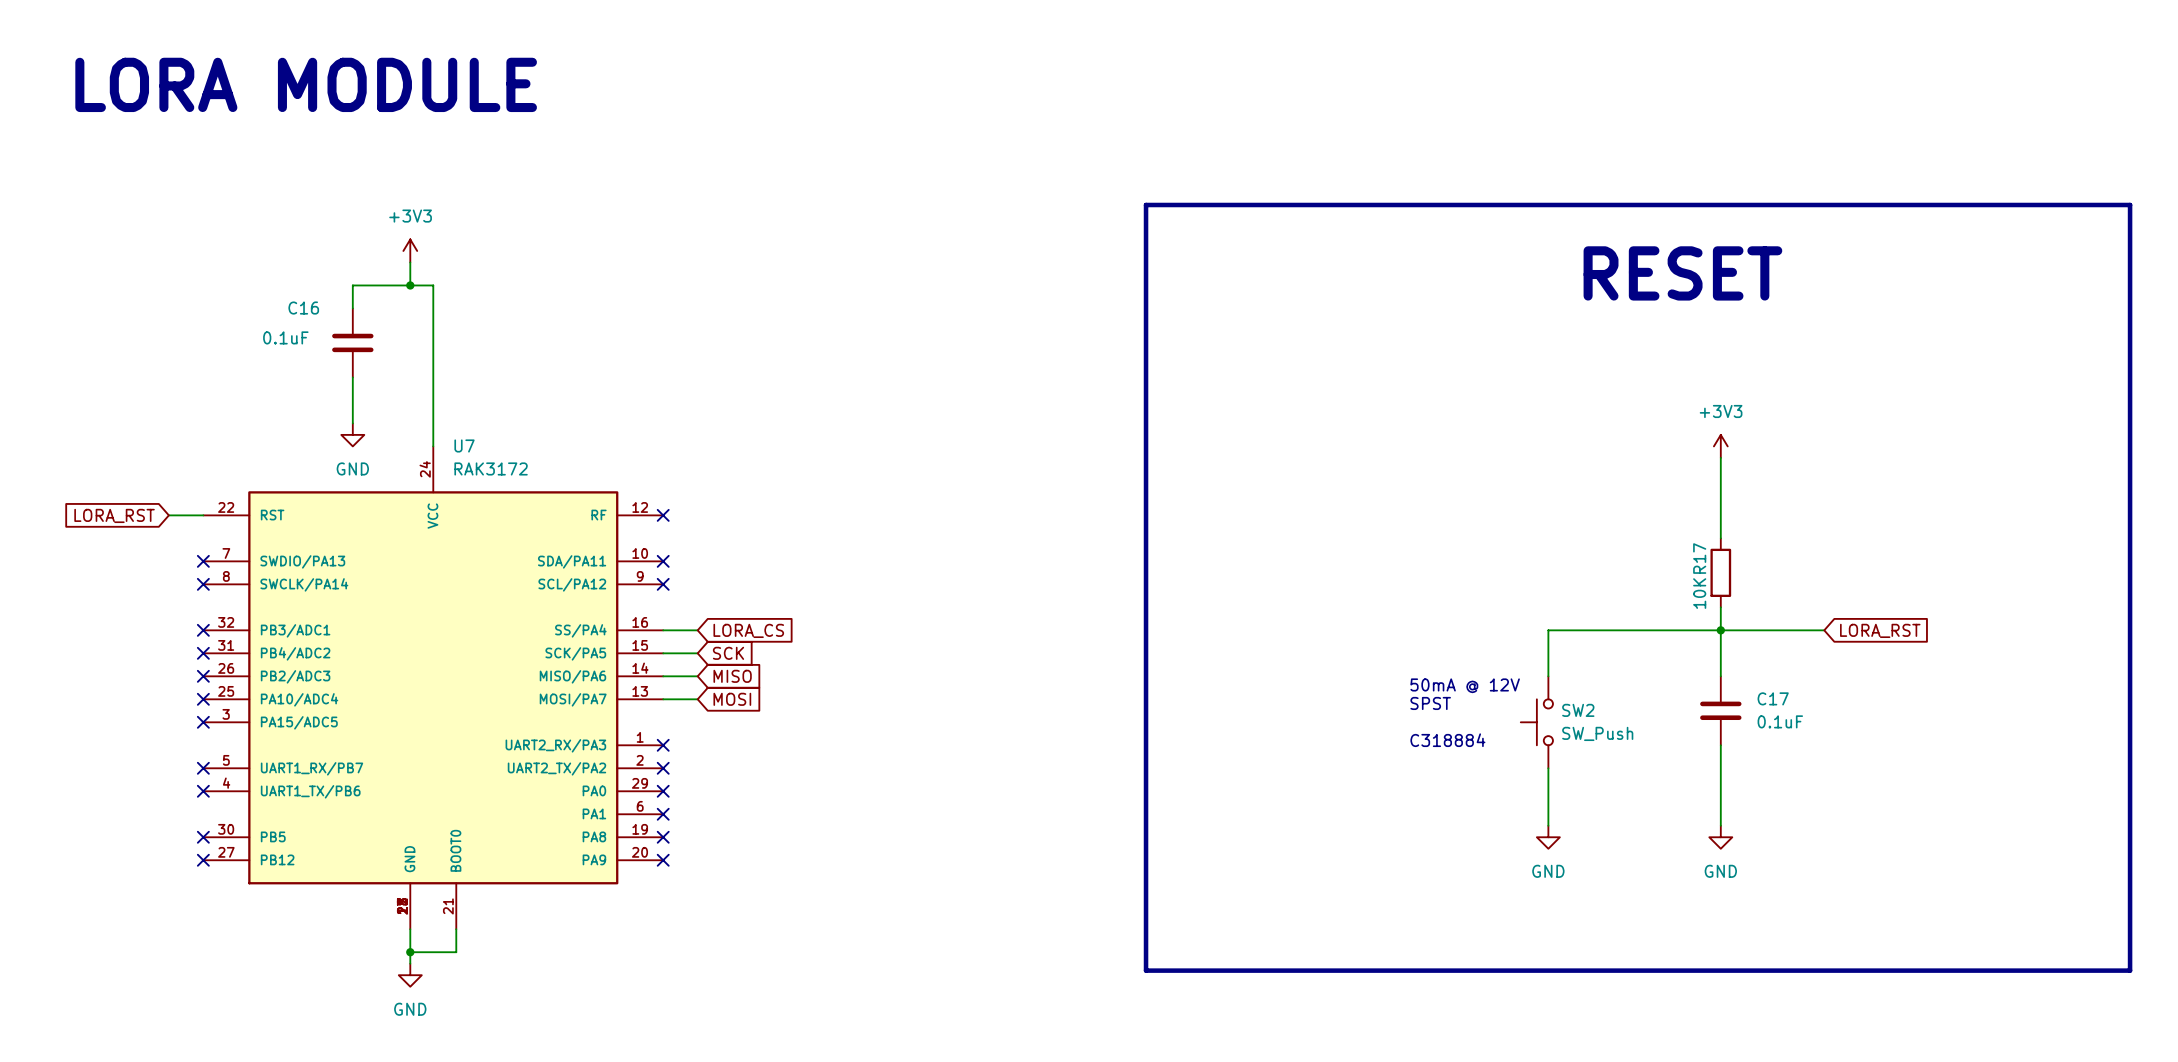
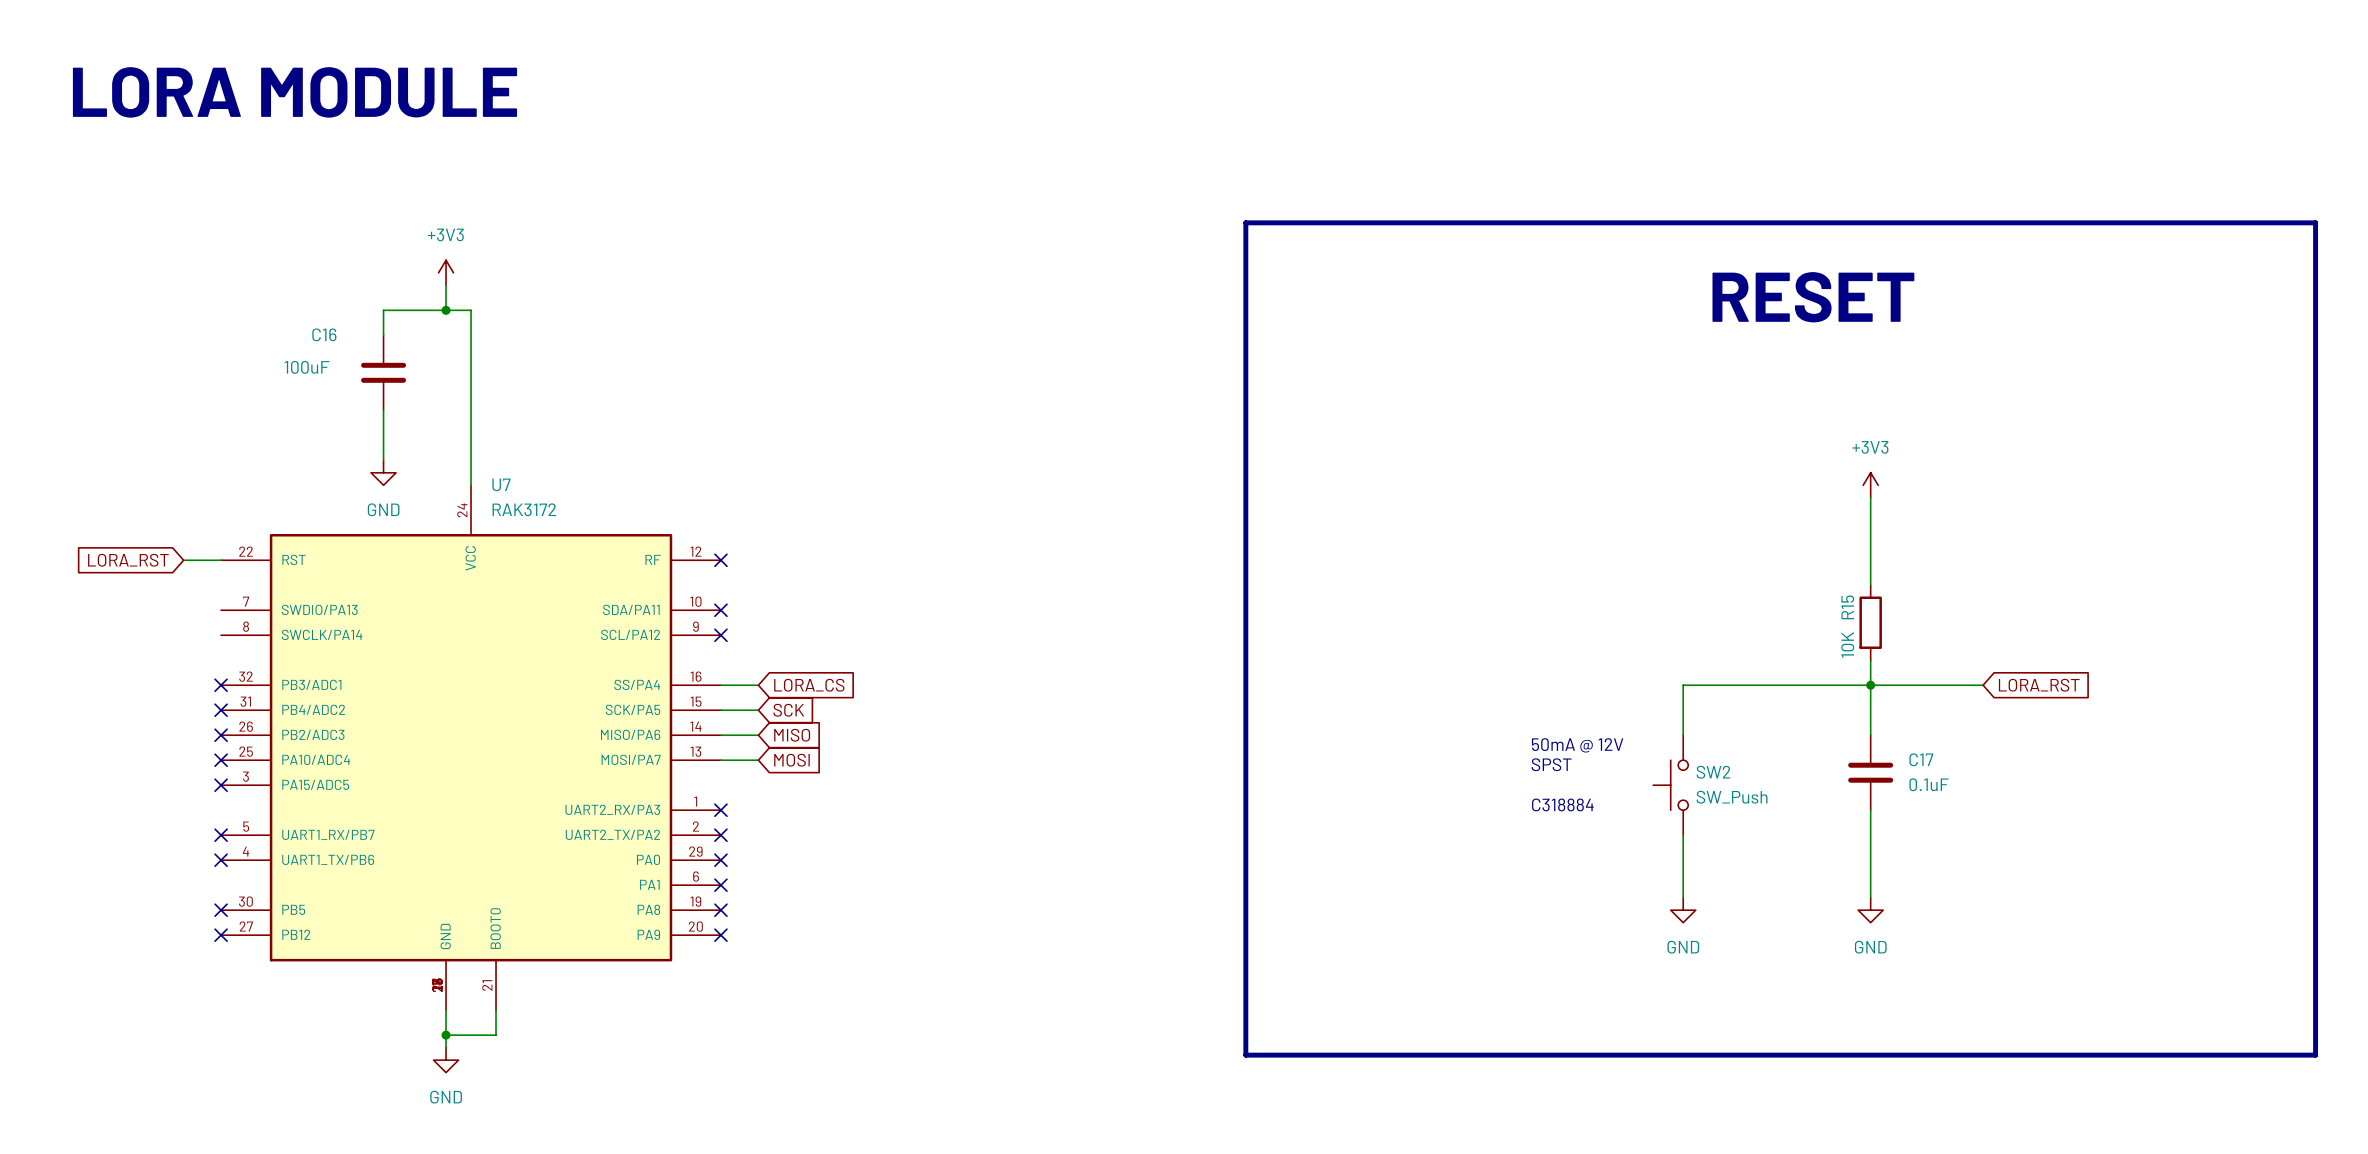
C16 value: 0.1uF (285, 337) -> 100uF (306, 367)
R17 name: R17 (1699, 558) -> R15 (1847, 607)
no-connect mark: (203, 561) -> none
no-connect mark: (203, 584) -> none

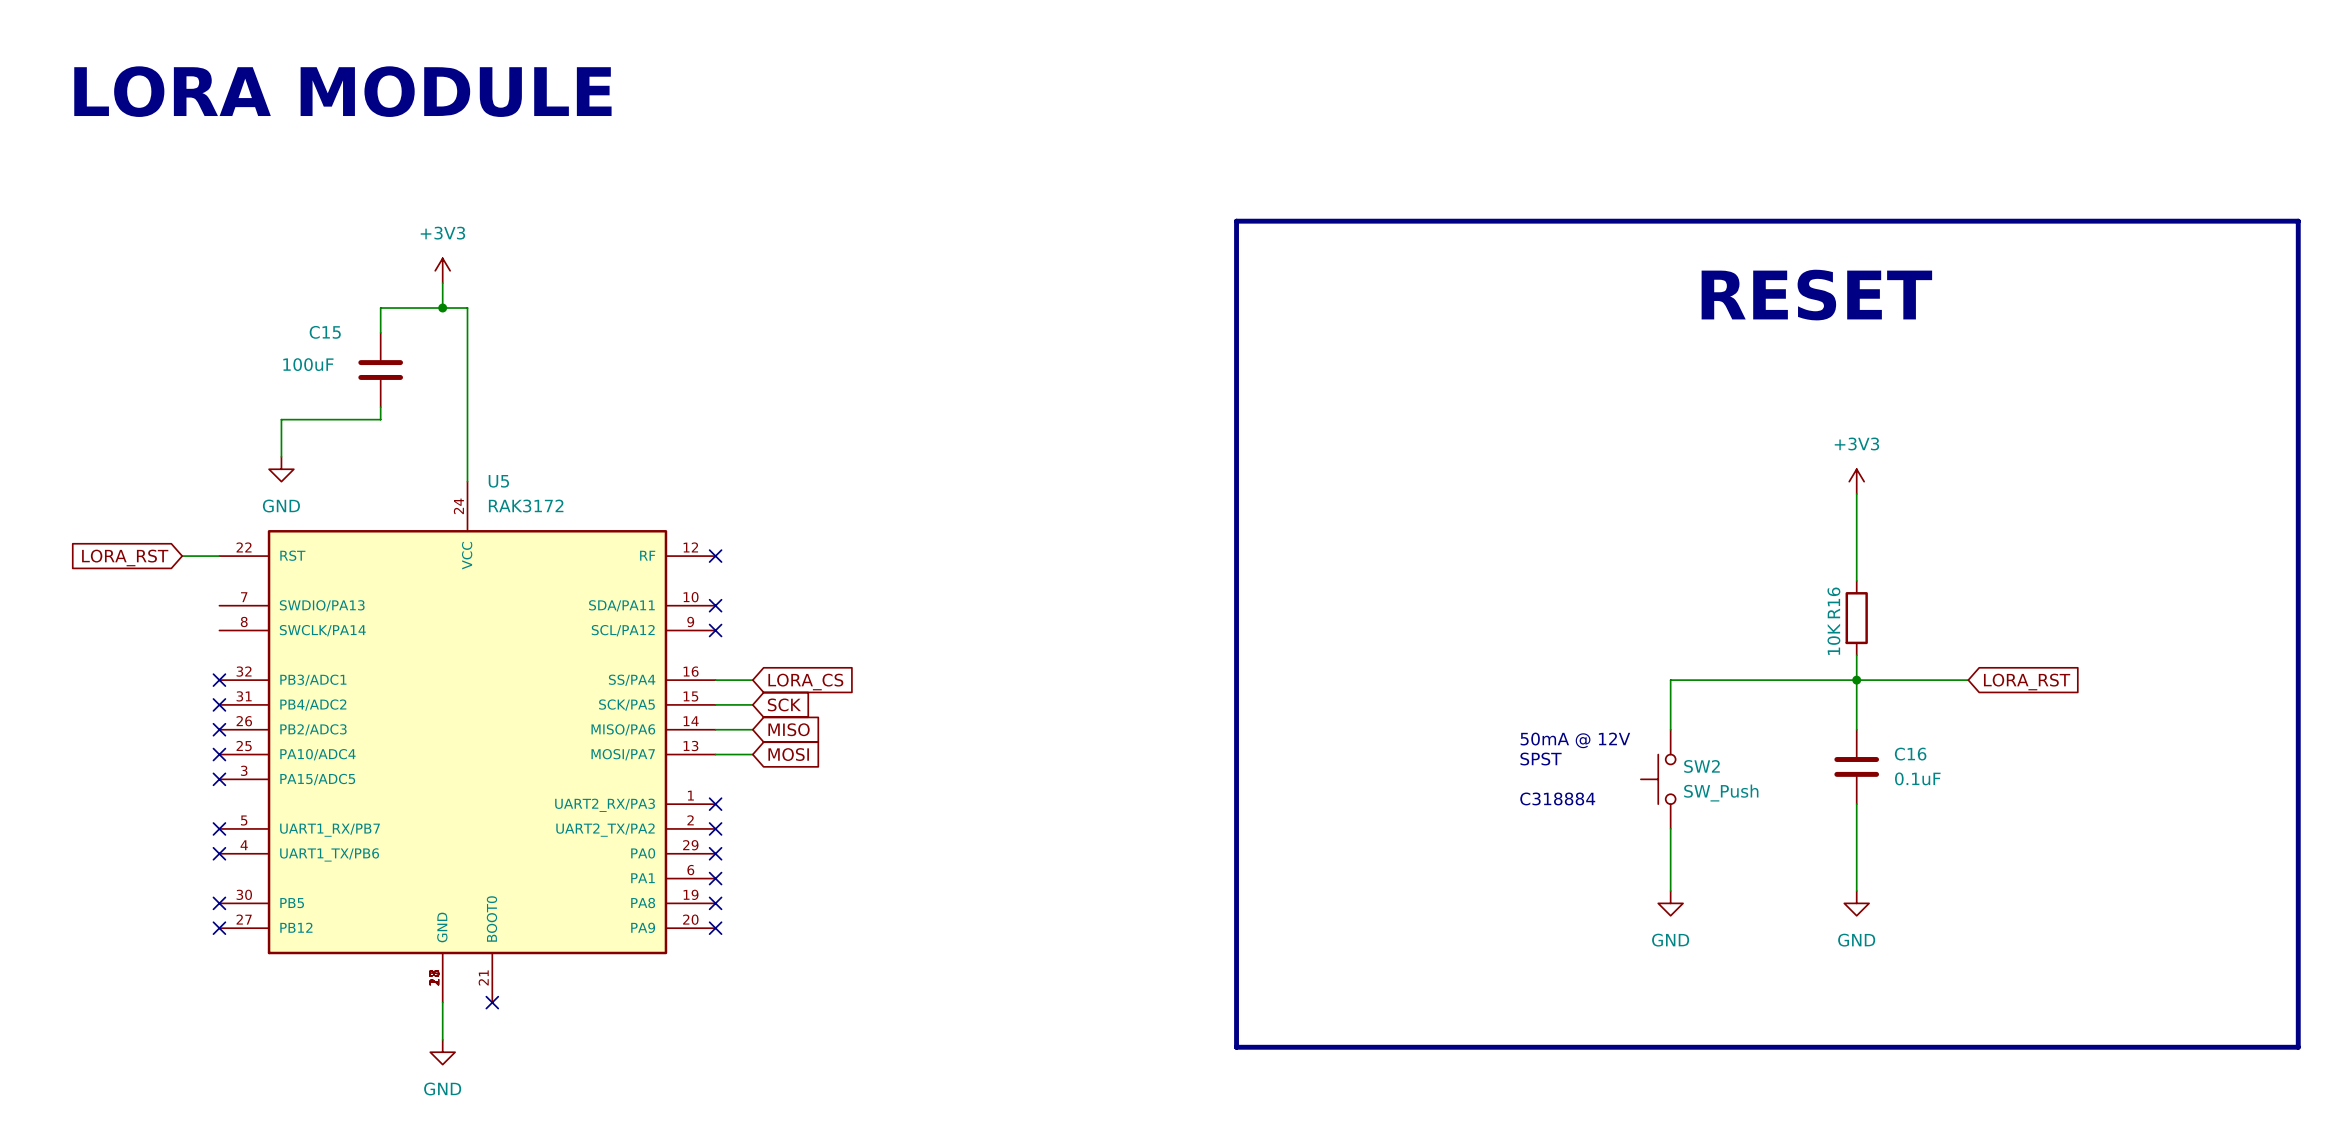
C16 name: C16 (324, 334) -> C15 (325, 332)
wire: (383, 422) (383, 460) -> (380, 419) (281, 419) (281, 456)
power symbol position: GND (383, 472) -> GND (281, 469)
U7 name: U7 (501, 484) -> U5 (498, 481)
R15 name: R15 (1847, 607) -> R16 (1833, 602)
C17 name: C17 (1921, 759) -> C16 (1910, 754)
wire: (496, 1010) (496, 1035) (446, 1035) -> none
no-connect mark: none -> (492, 1002)
junction: (446, 1035) -> none

